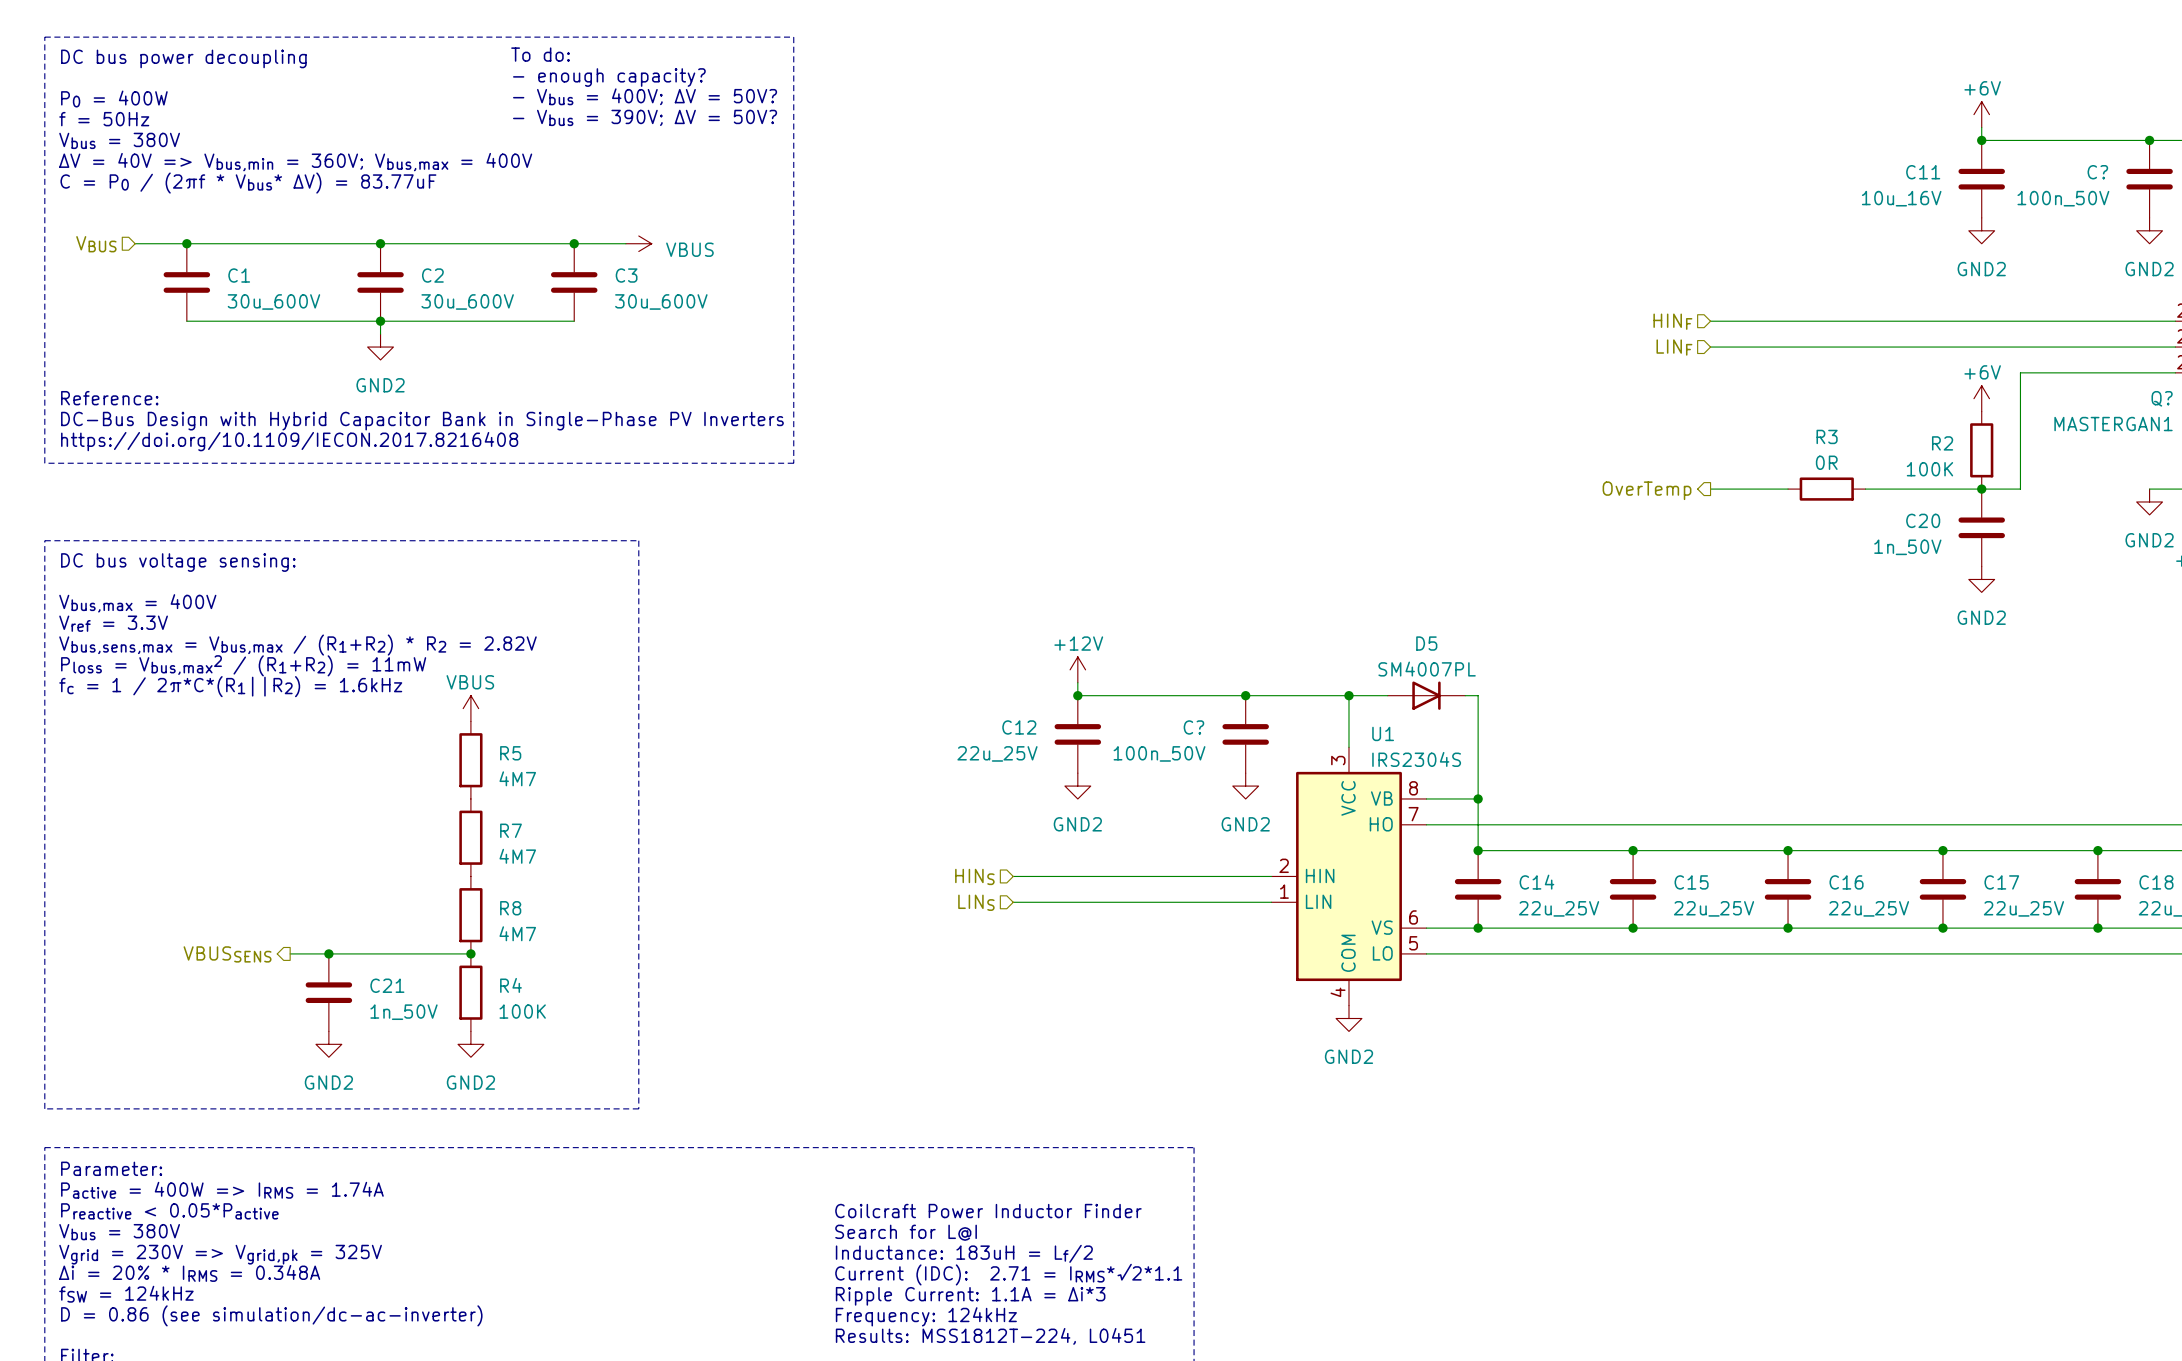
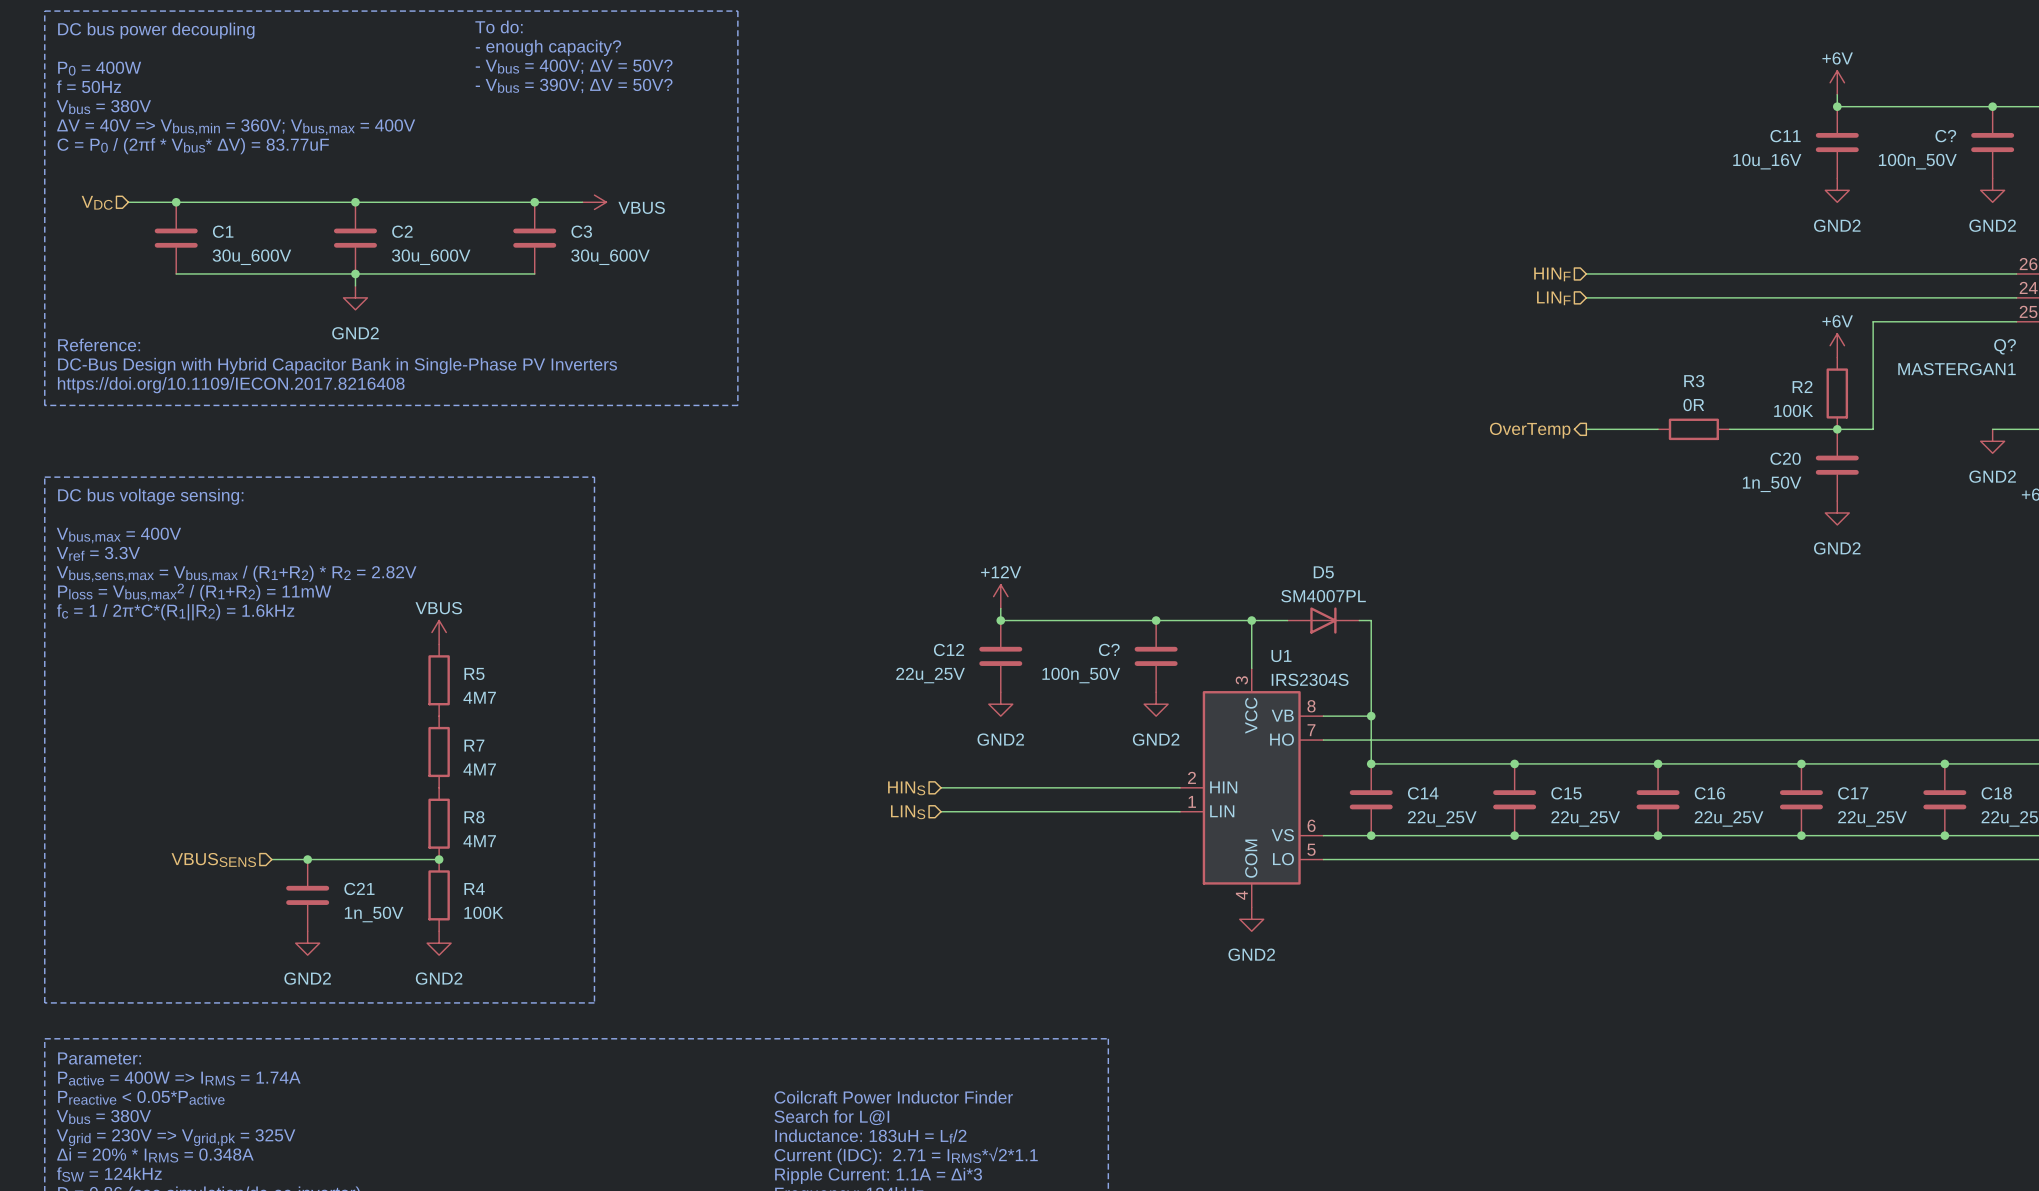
hierarchical label: VBUS (96, 244) -> VDC (97, 202)
hierarchical label shape: output (227, 954) -> input (213, 859)

